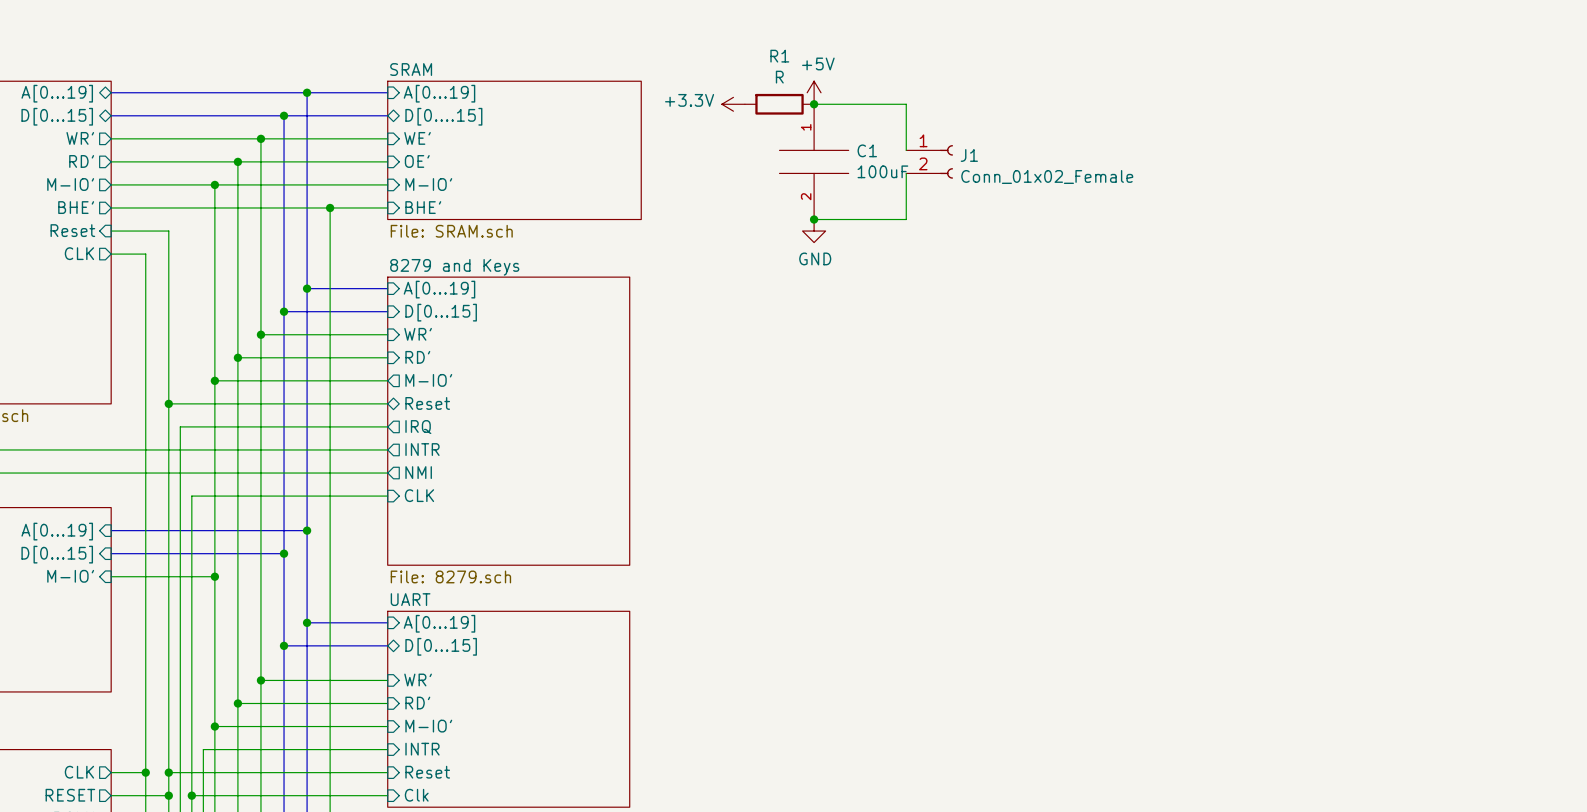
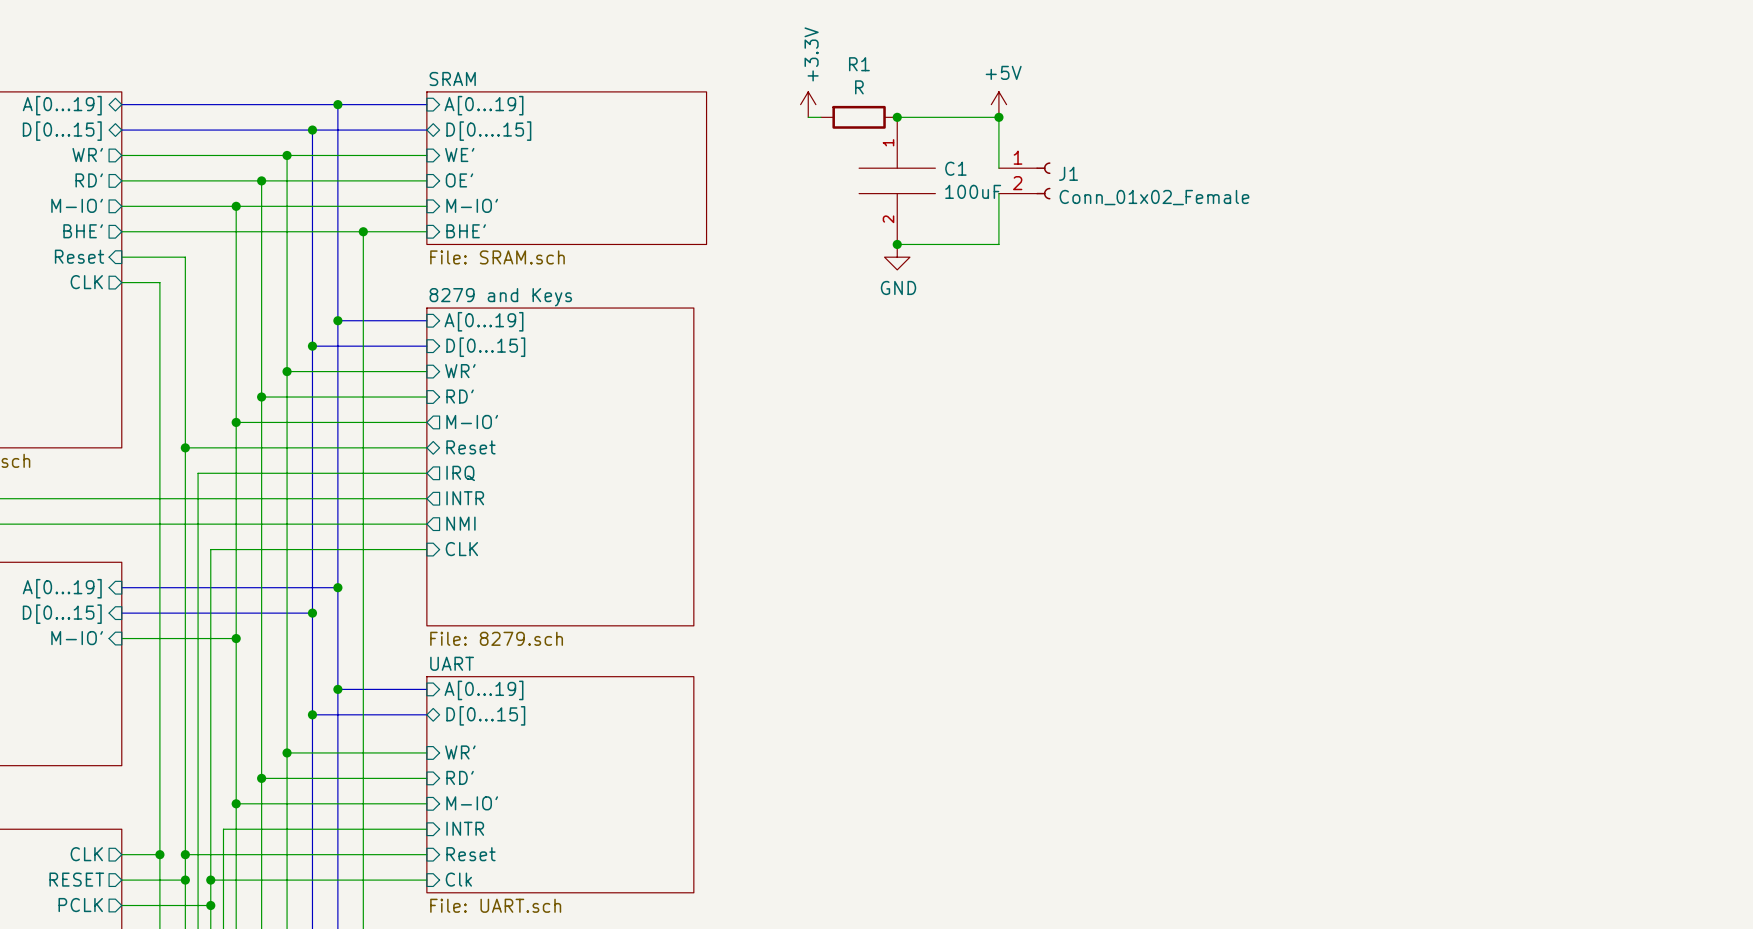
power symbol position: +5V (814, 92) -> +5V (998, 104)
power symbol rotation: 0° (733, 104) -> 90° clockwise (808, 104)
junction: none -> (998, 117)

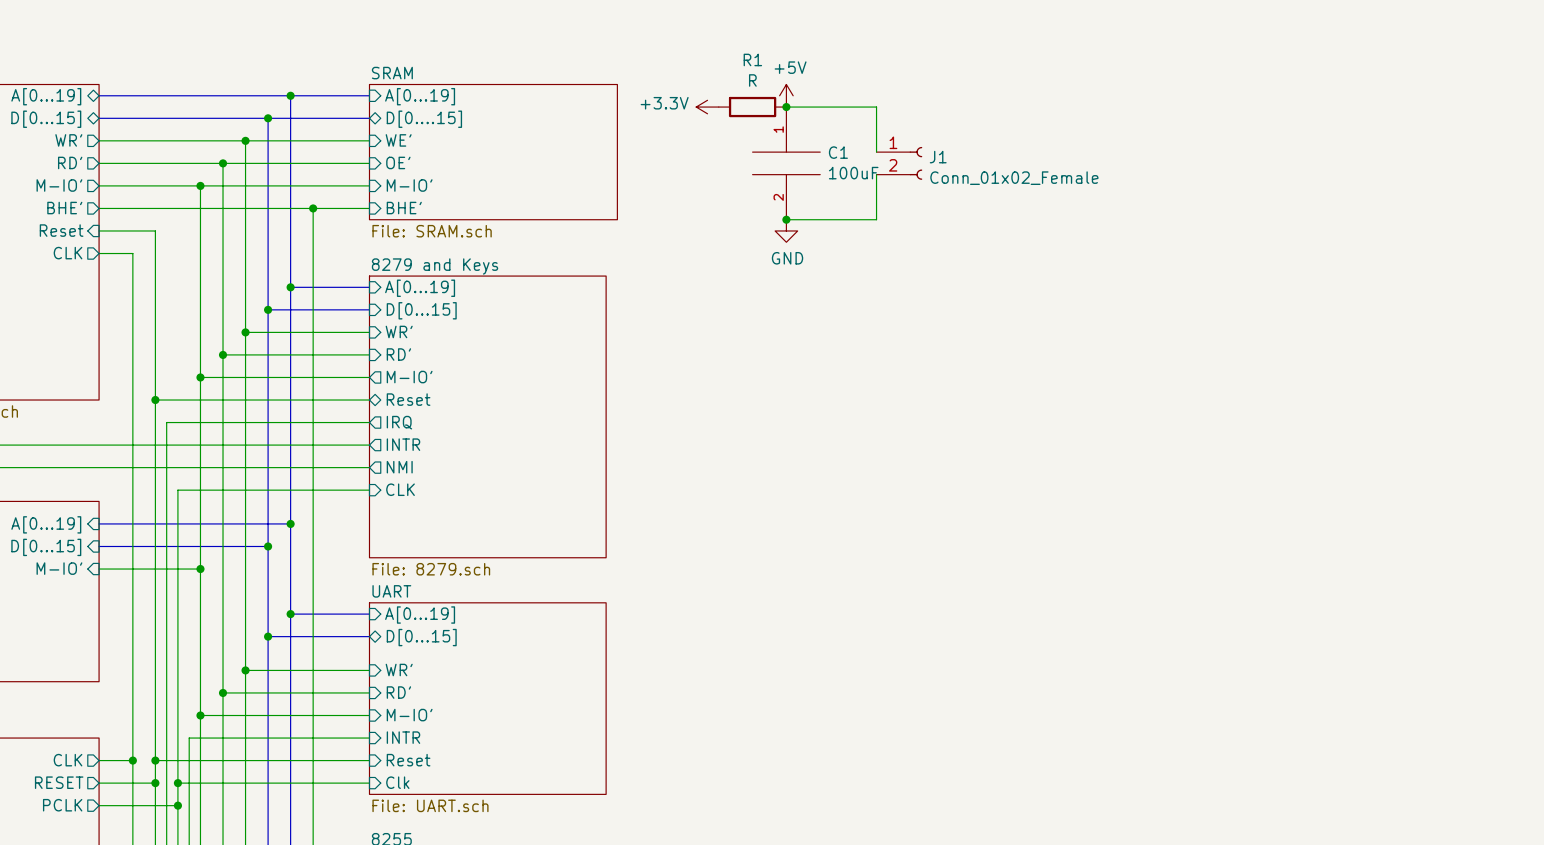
power symbol rotation: 0° (808, 104) -> 90° counterclockwise (707, 107)
power symbol position: +5V (998, 104) -> +5V (786, 95)
junction: (998, 117) -> none

